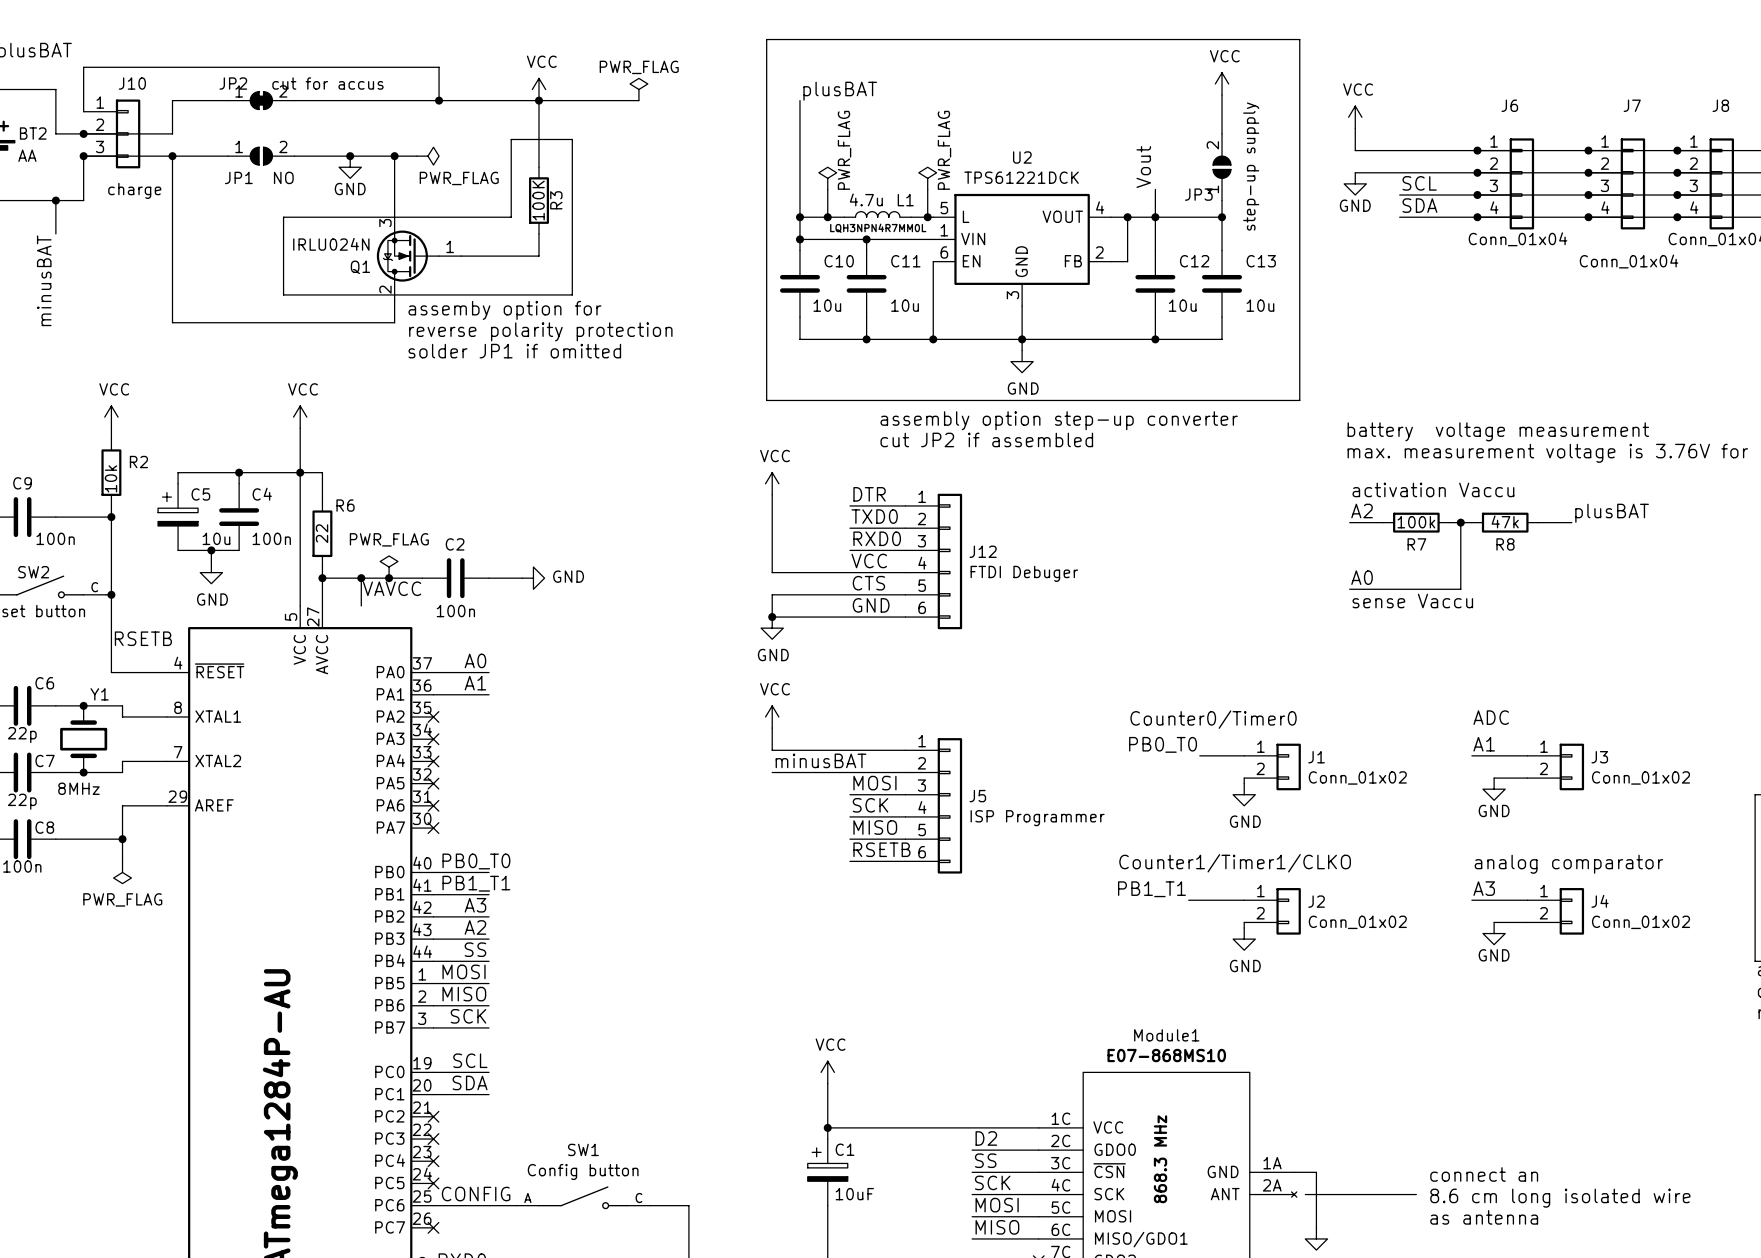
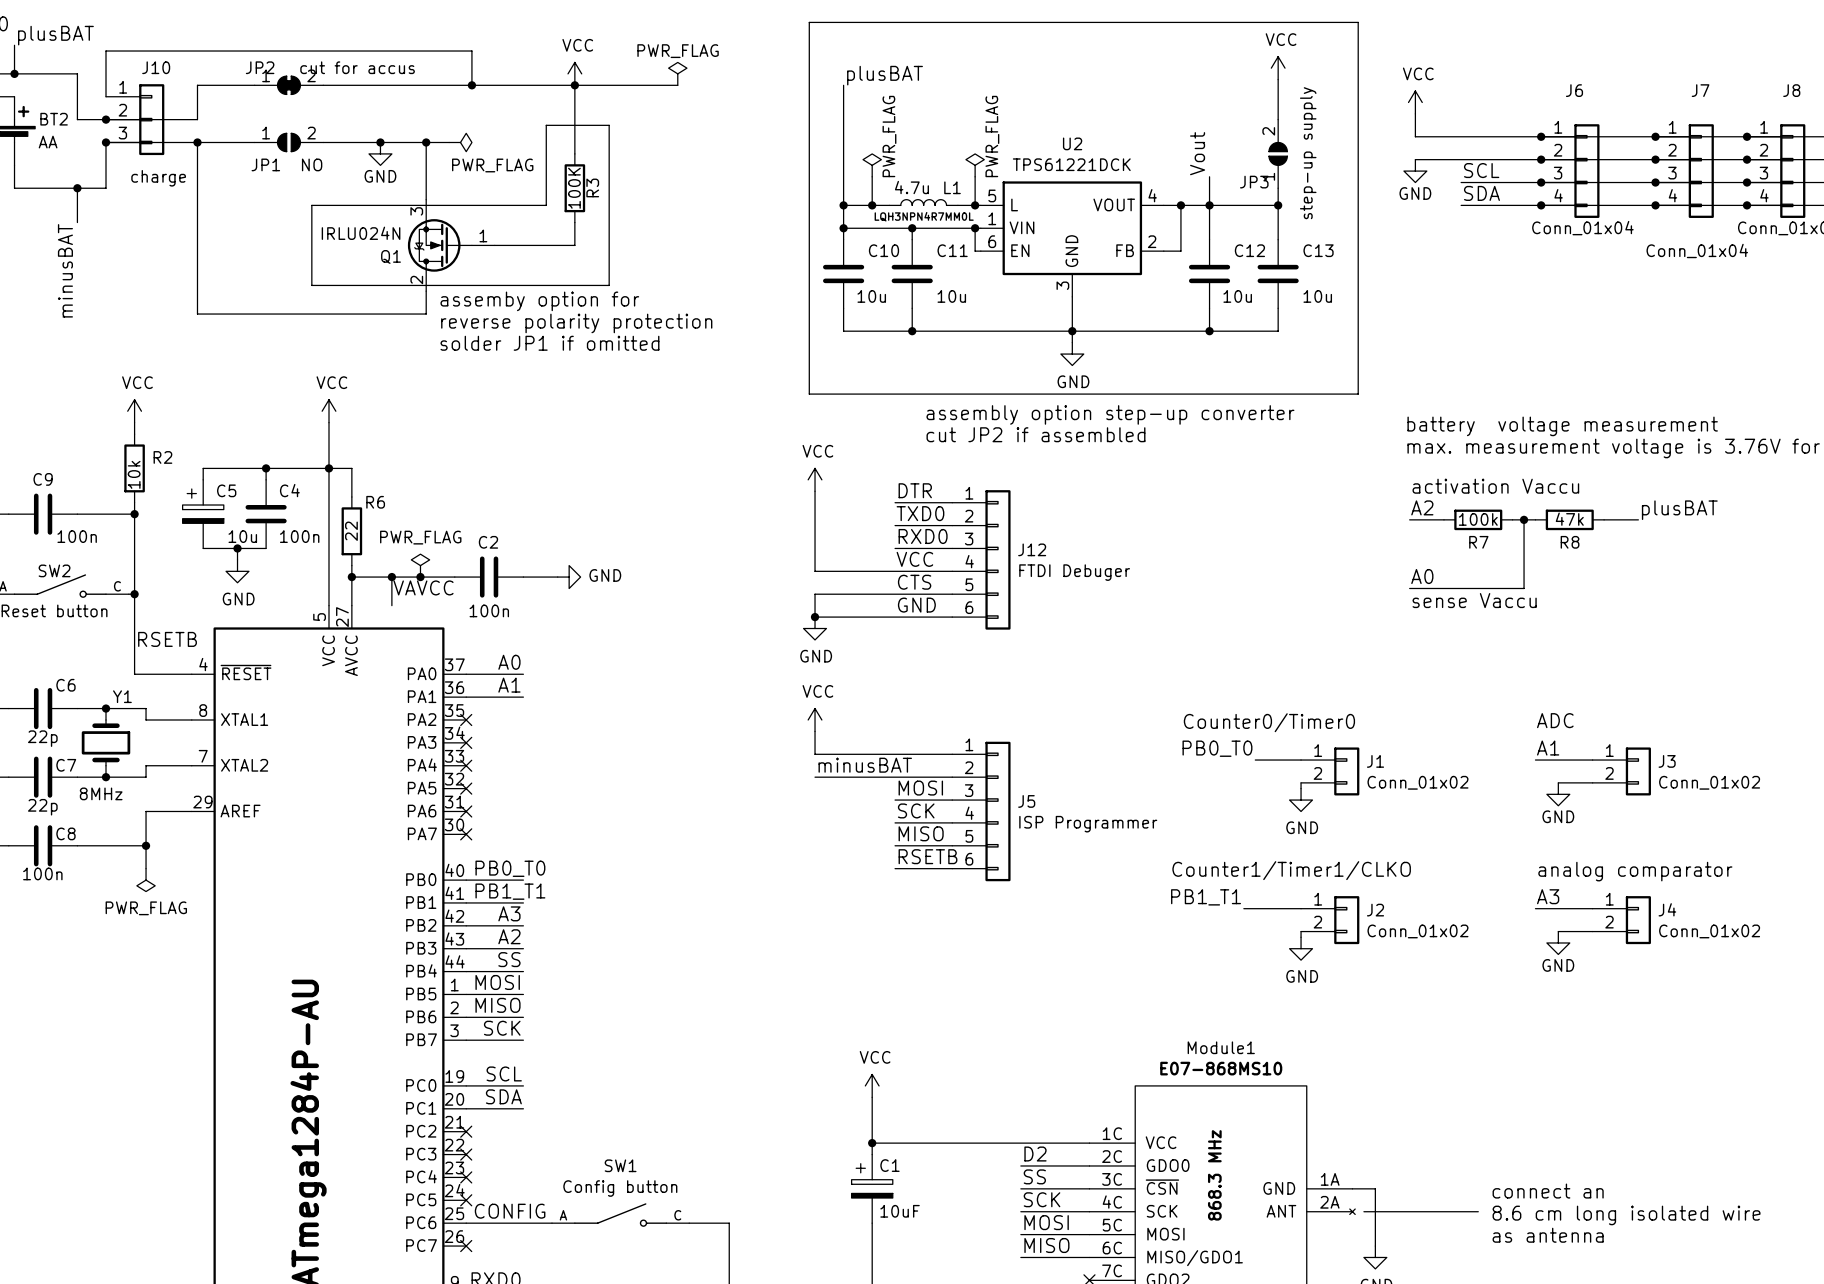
junction: none -> (975, 228)
wire: (933, 261) (933, 339) -> (980, 251) (975, 251) (975, 228)
junction: (933, 339) -> none

